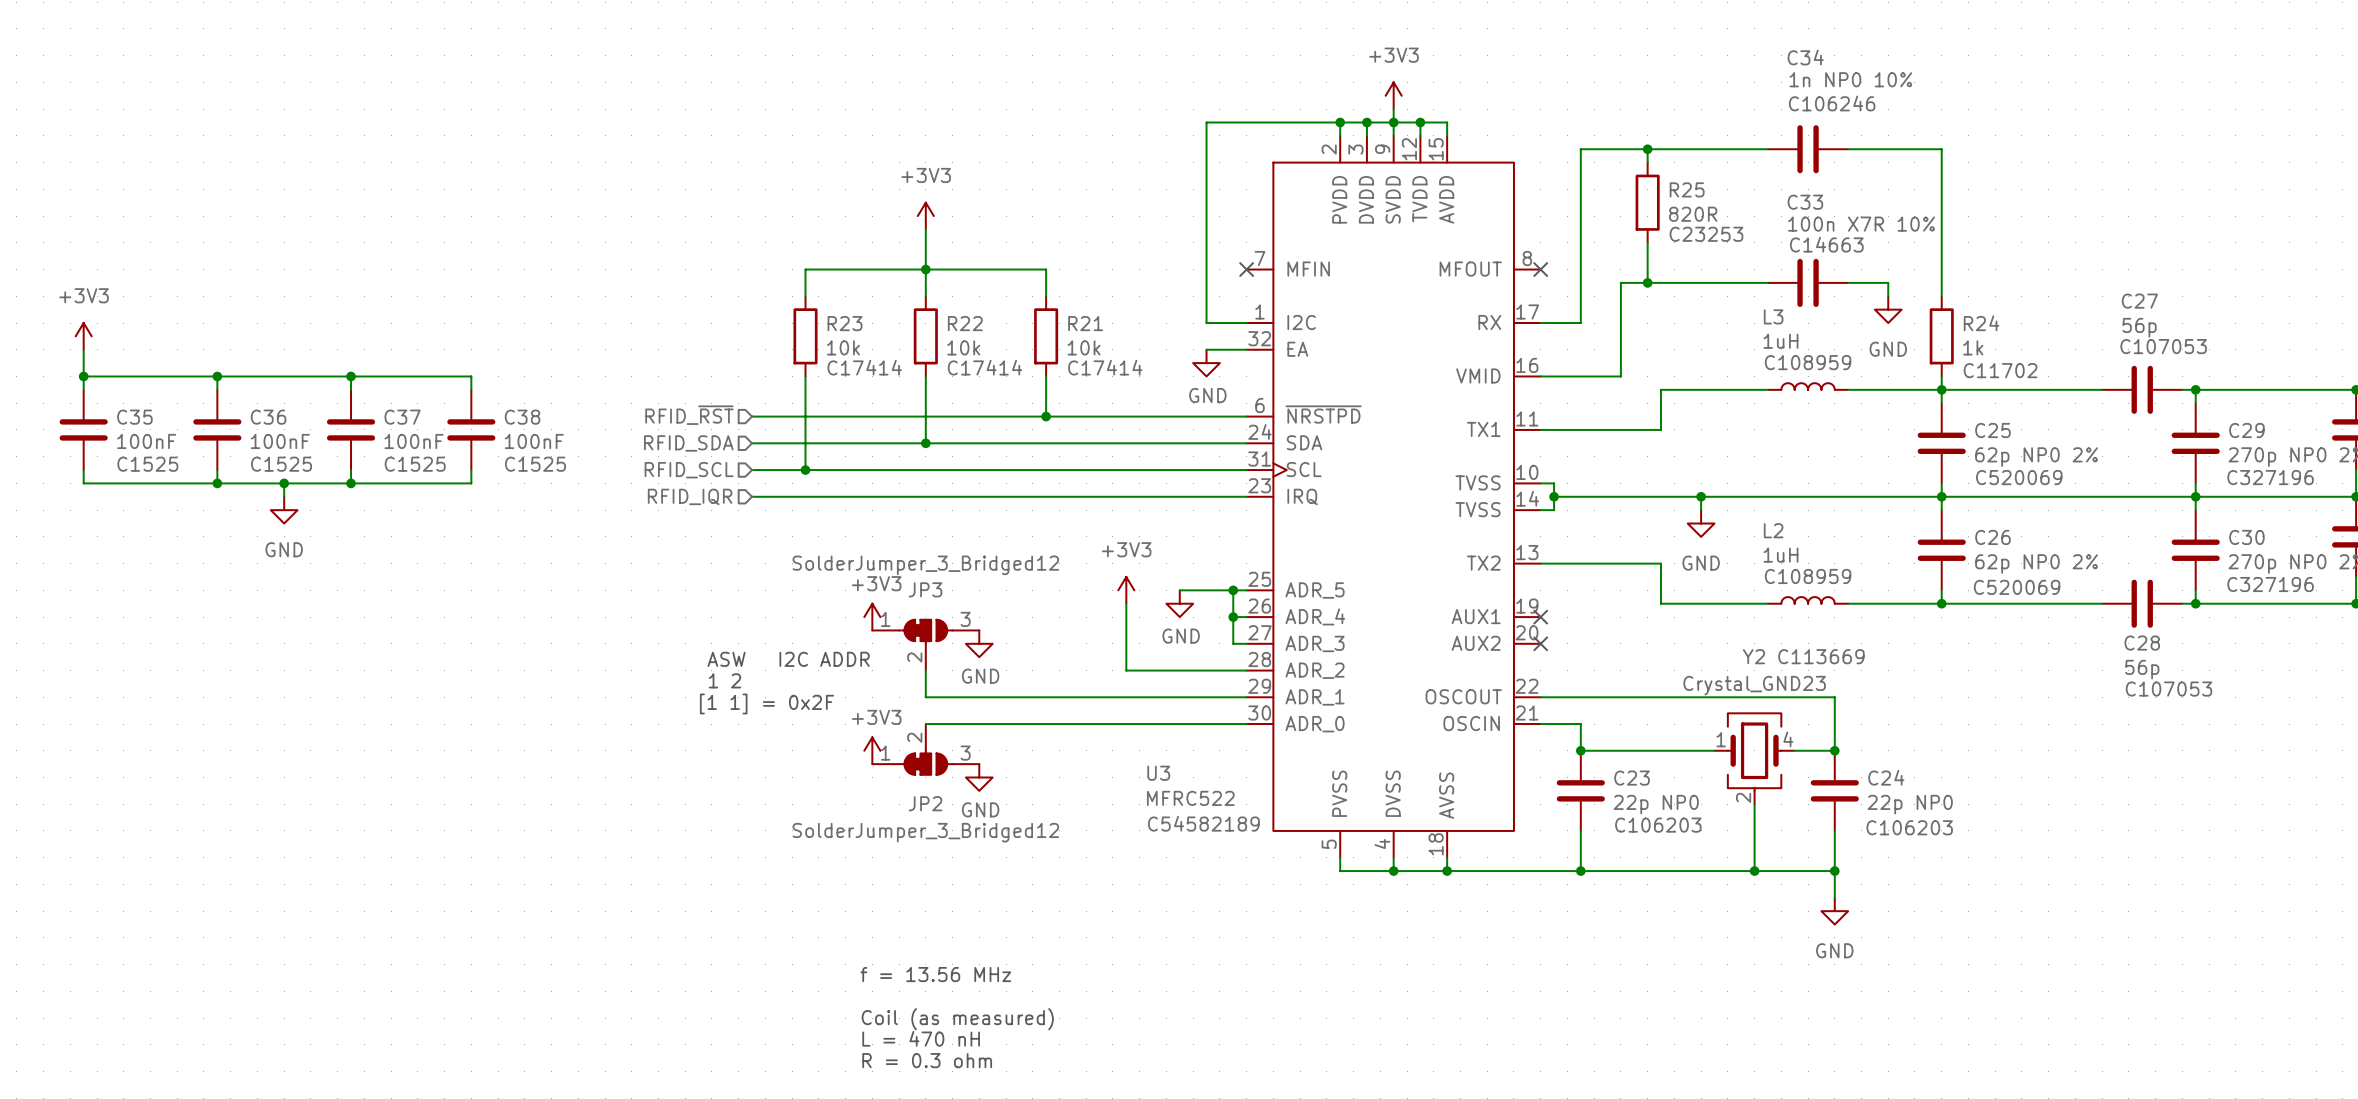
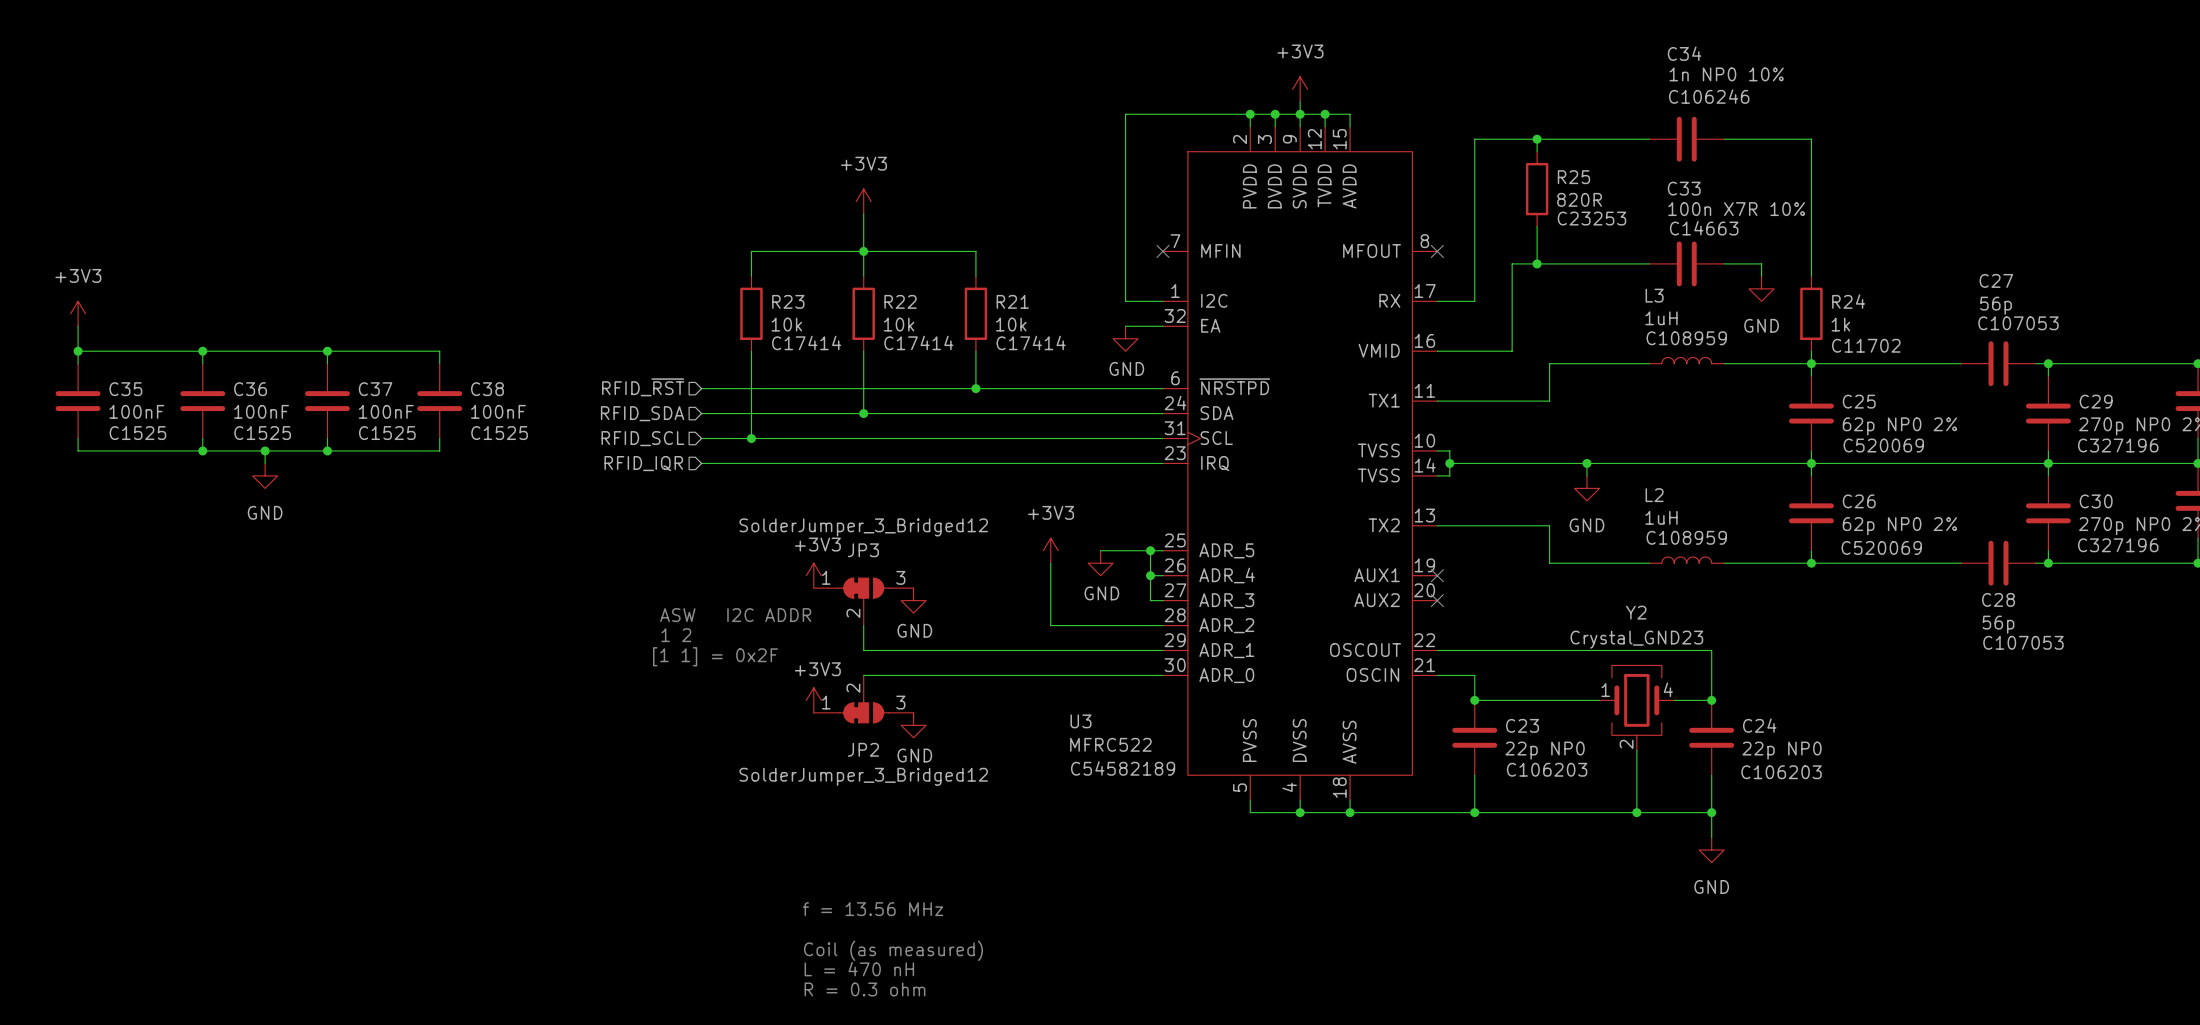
Y2 text: C113669 (1821, 656) -> none

